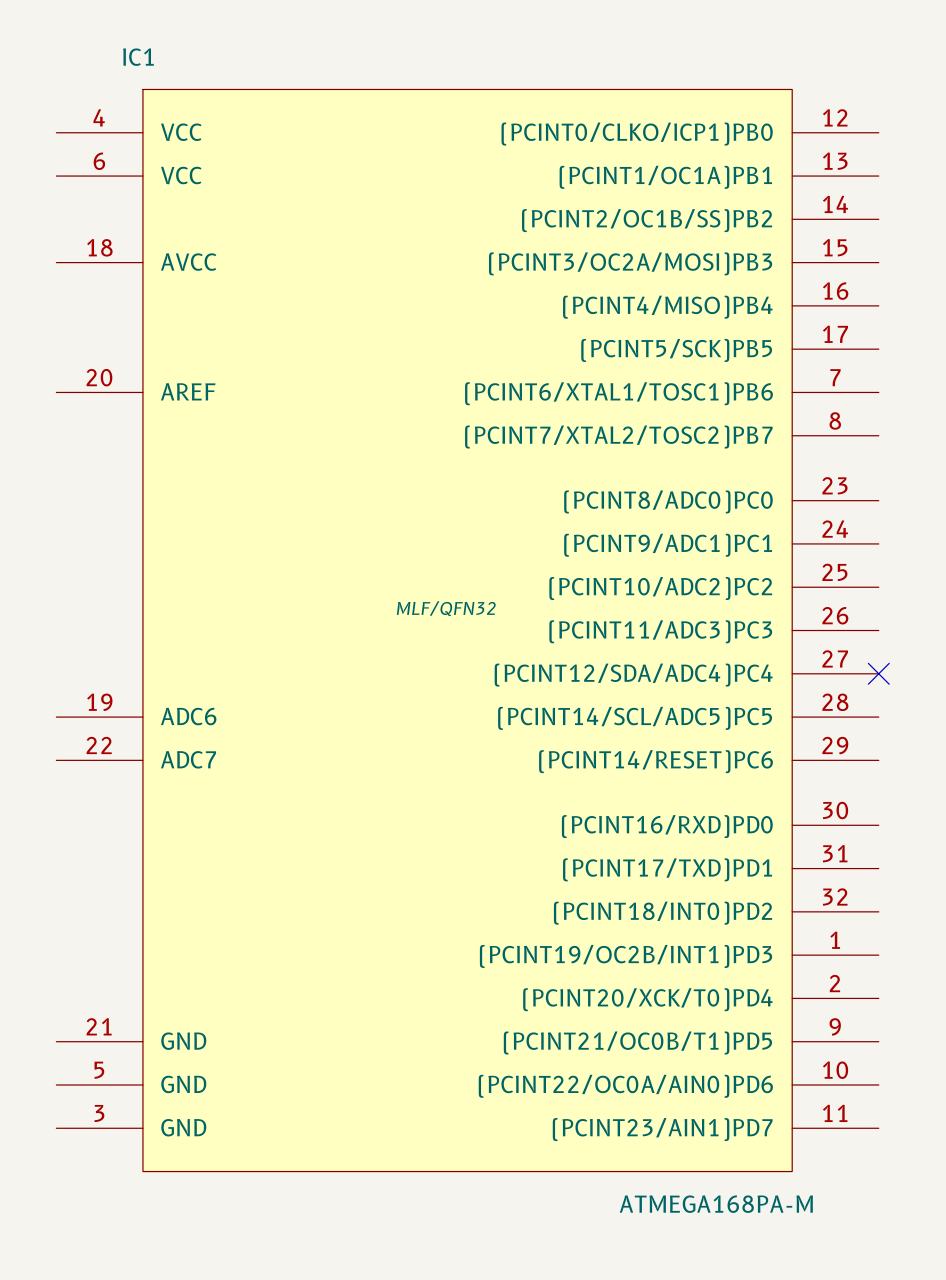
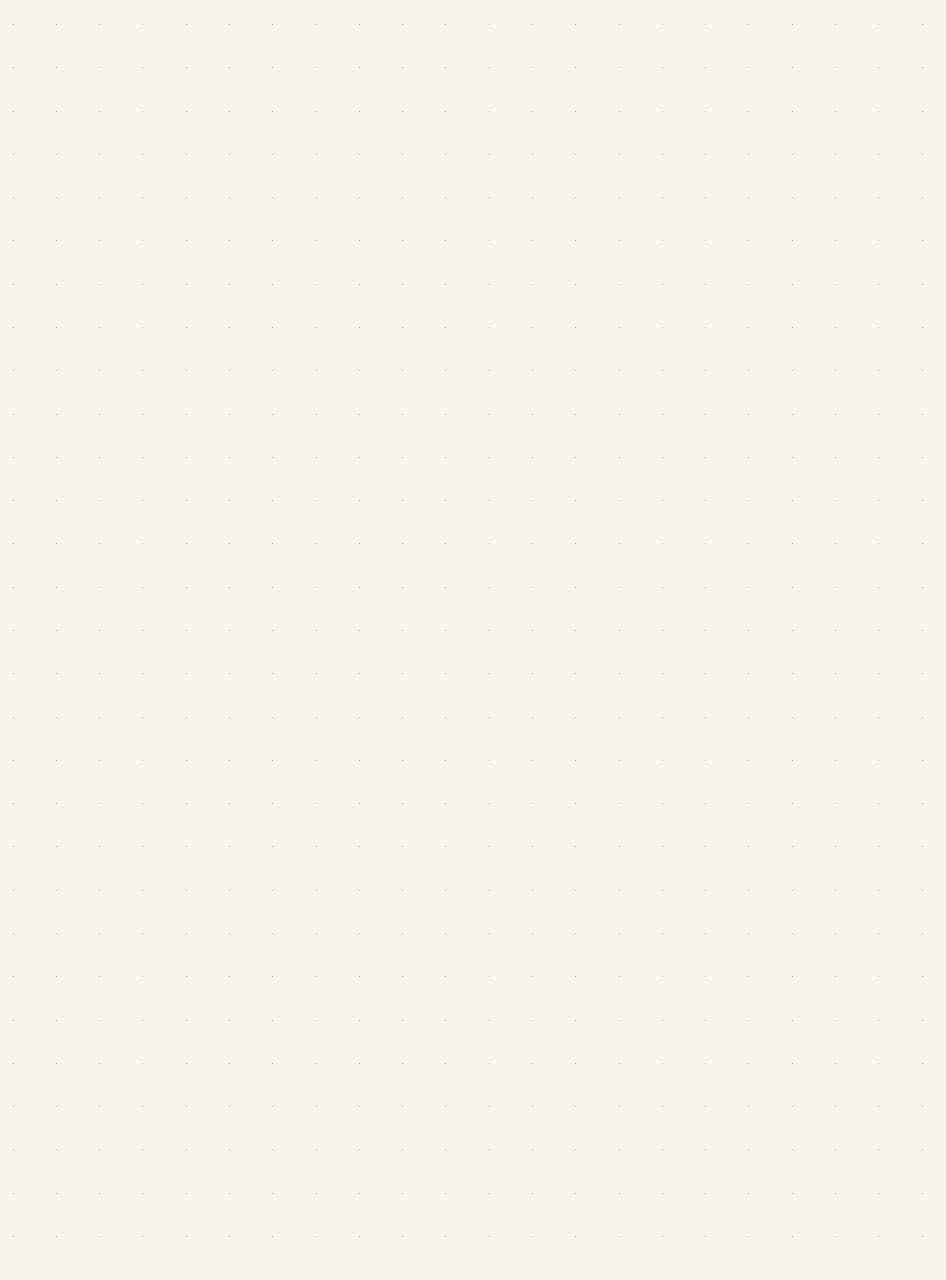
IC1: ATMEGA168PA-M (467, 630) -> none
no-connect mark: (878, 673) -> none

